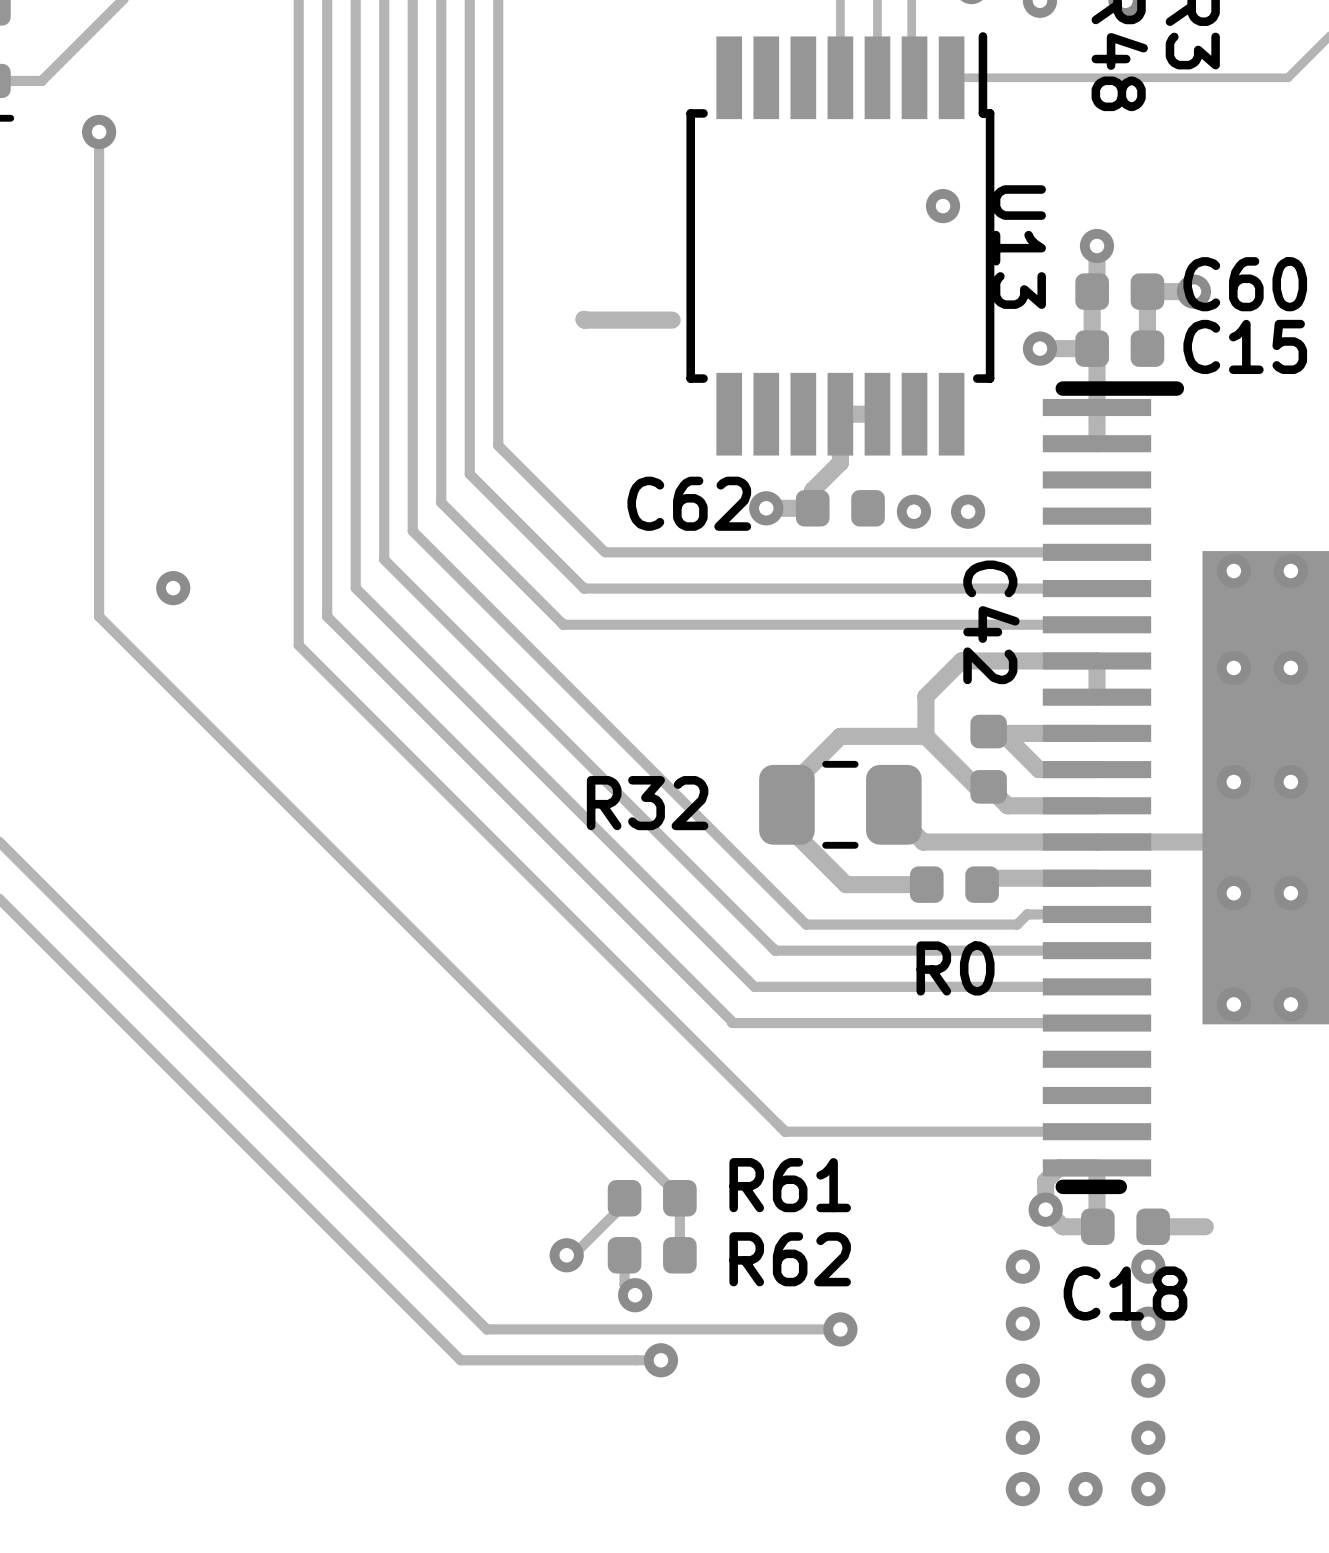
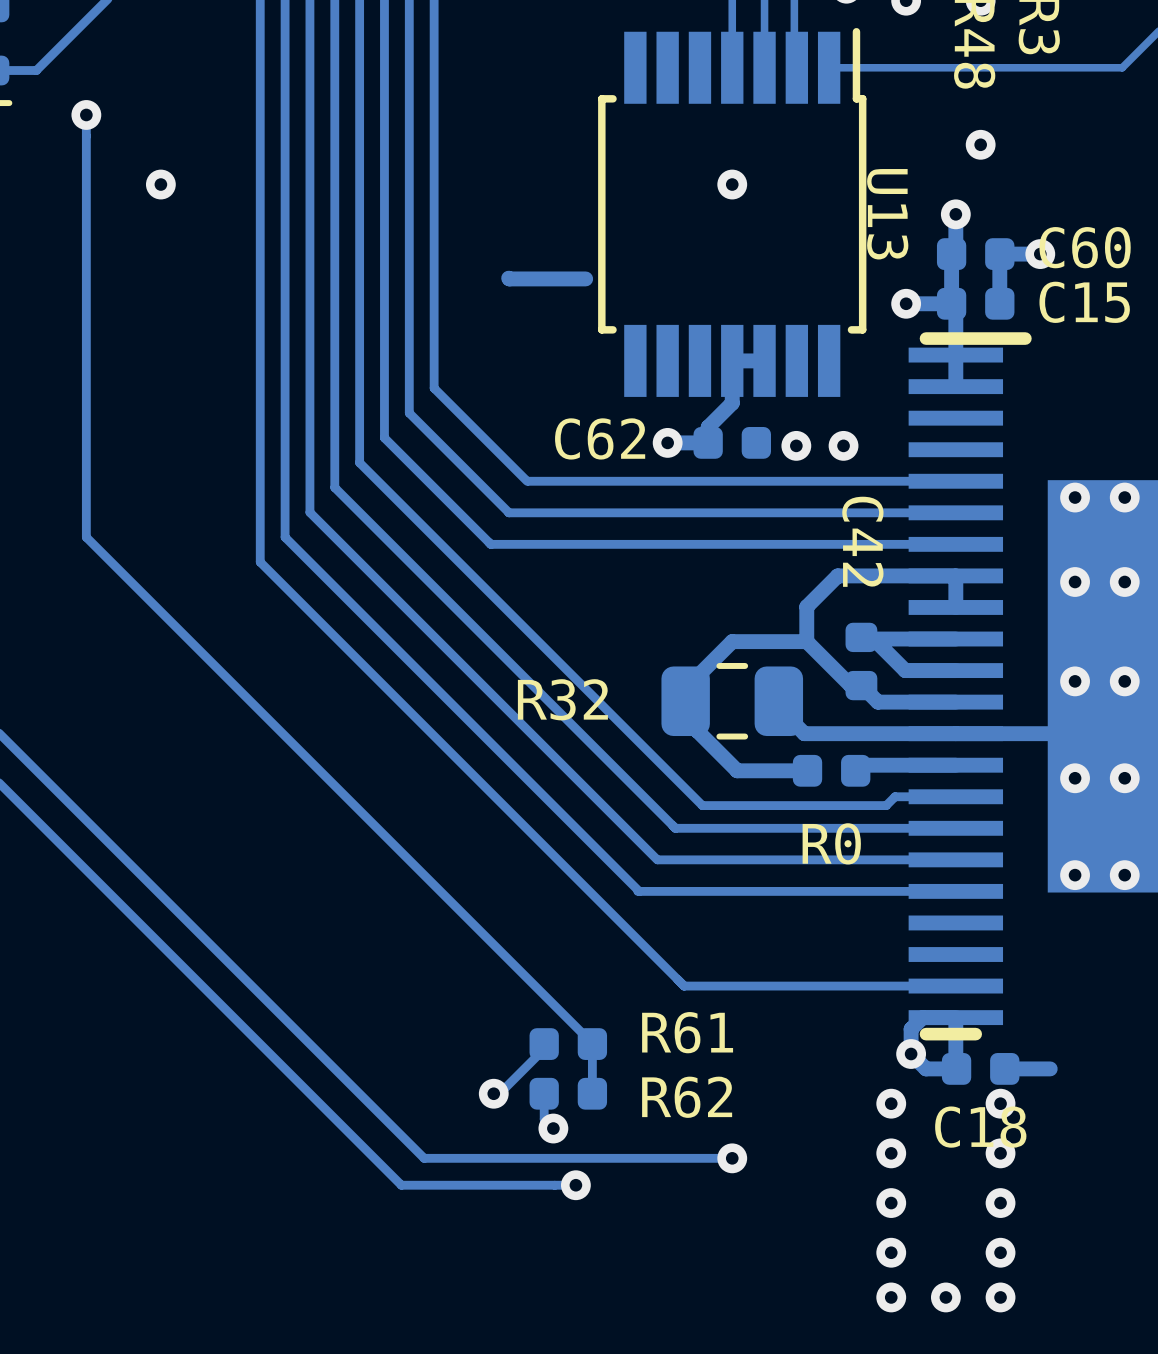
via: none -> (980, 144)
via: (943, 206) -> none
via: none -> (160, 184)
via: none -> (732, 184)
via: (173, 588) -> none

